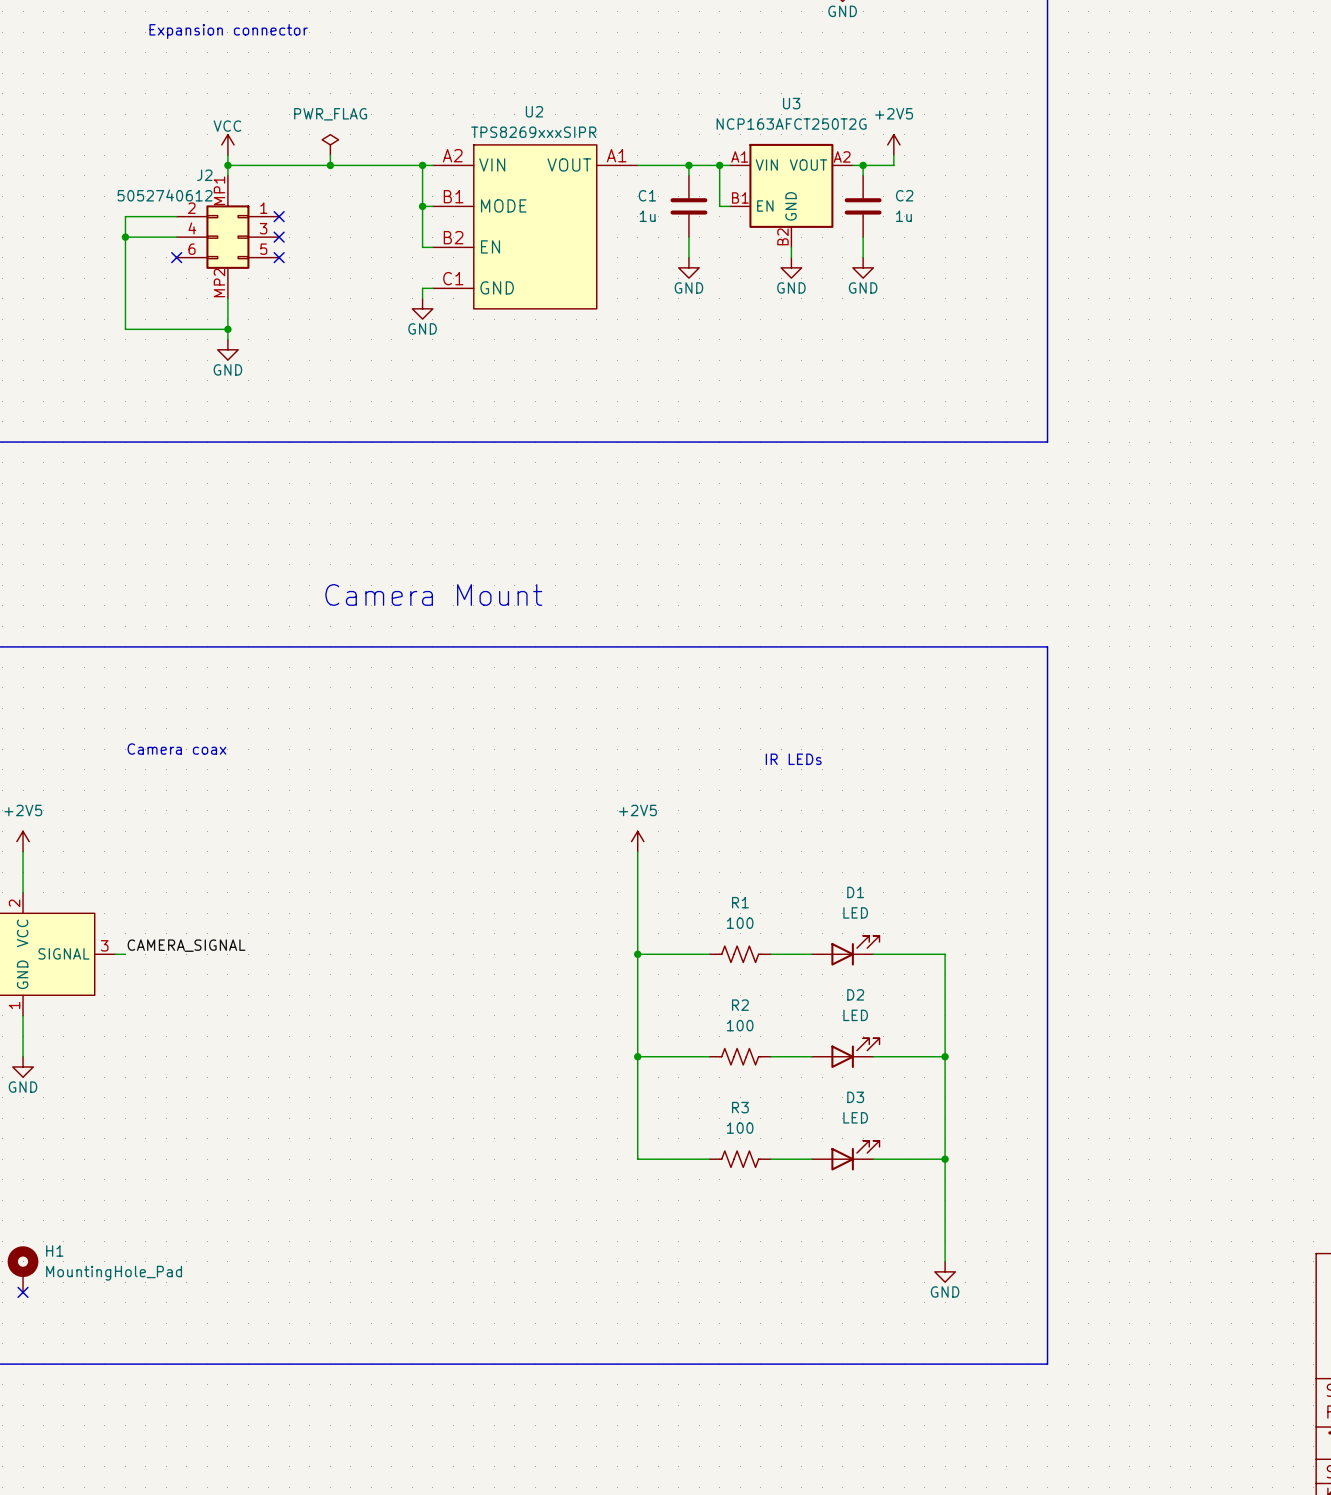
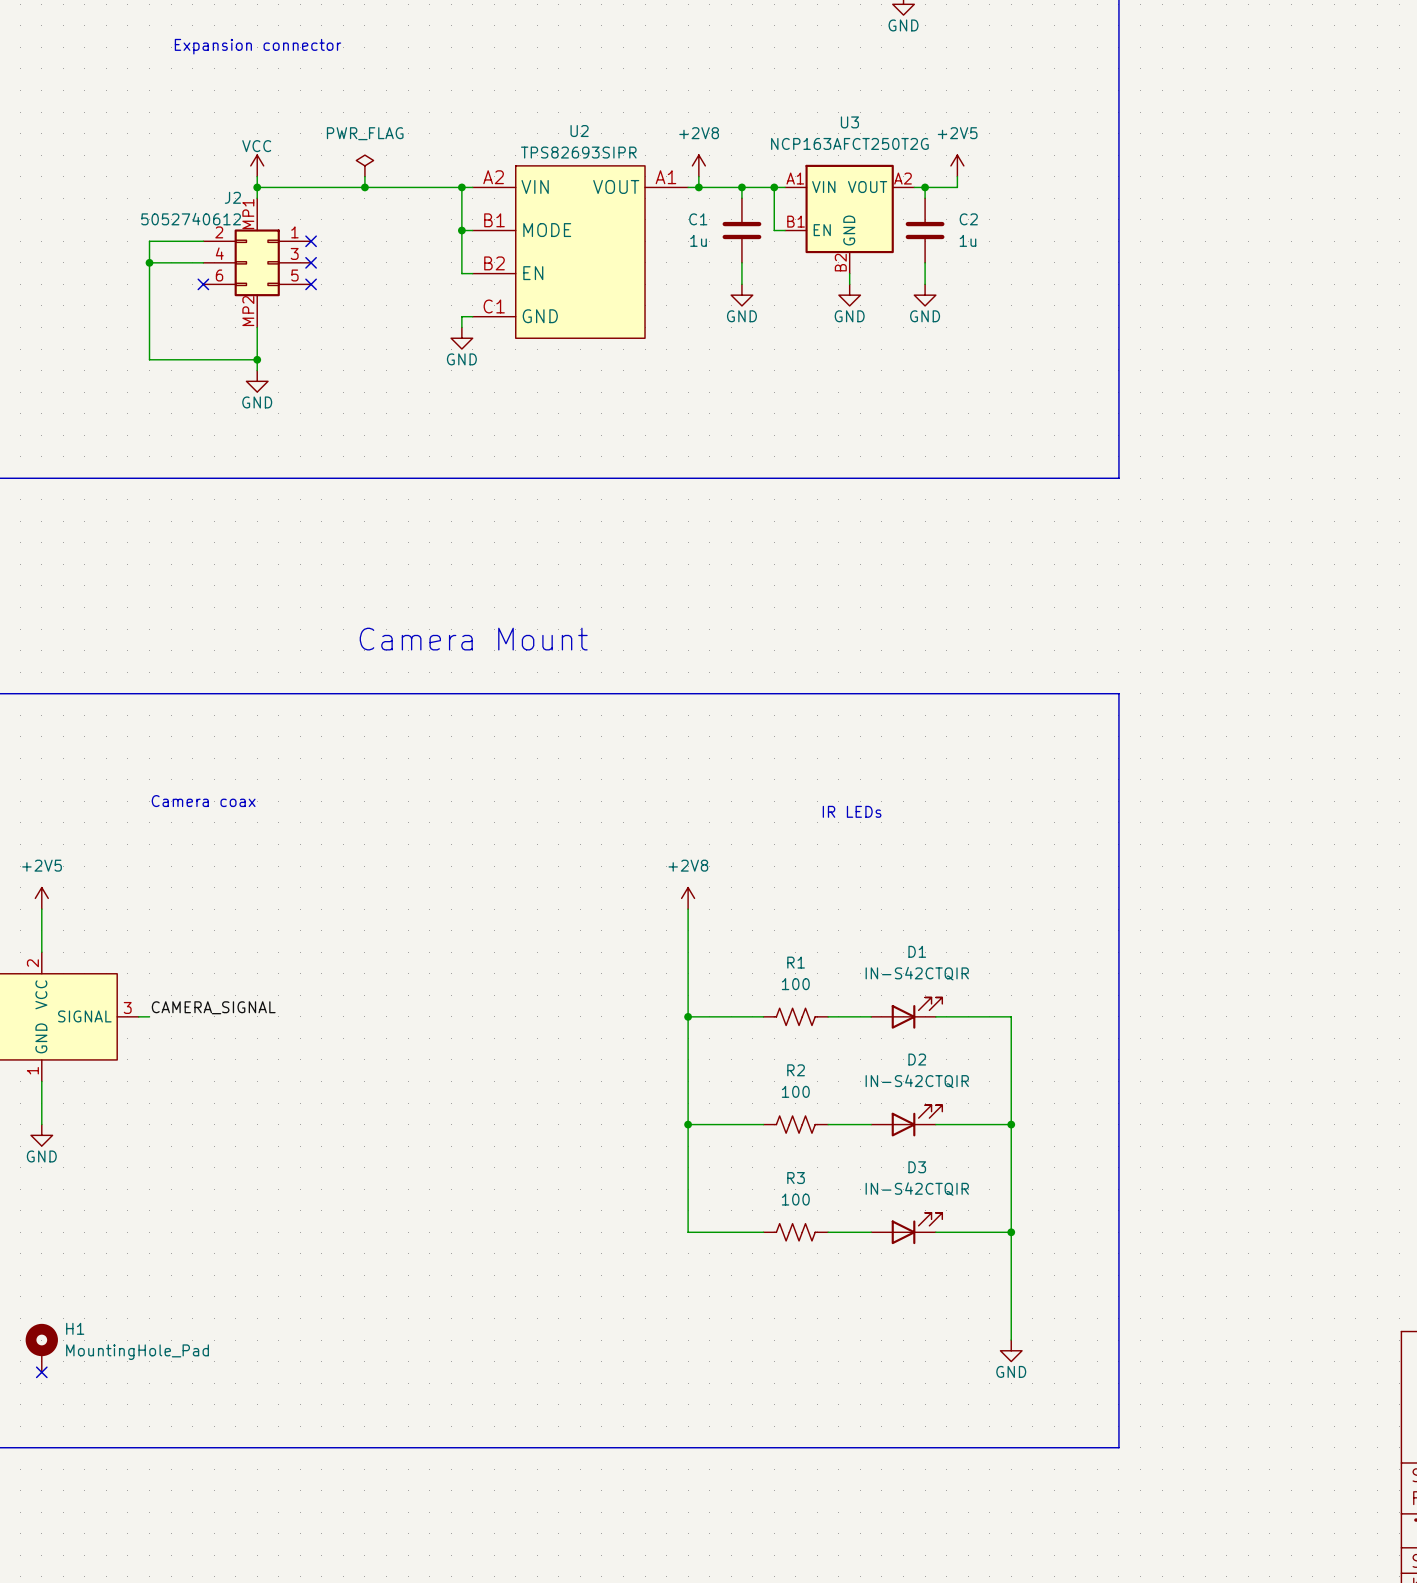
U2 value: TPS8269xxxSIPR (533, 132) -> TPS82693SIPR (578, 152)
power symbol: none -> +2V8 (698, 165)
wire: none -> (698, 176) (698, 187)
junction: none -> (698, 187)
power symbol: +2V5 (637, 841) -> +2V8 (688, 898)
D1 value: LED (855, 912) -> IN-S42CTQIR (917, 973)
D2 value: LED (855, 1015) -> IN-S42CTQIR (917, 1081)
D3 value: LED (855, 1117) -> IN-S42CTQIR (917, 1189)

